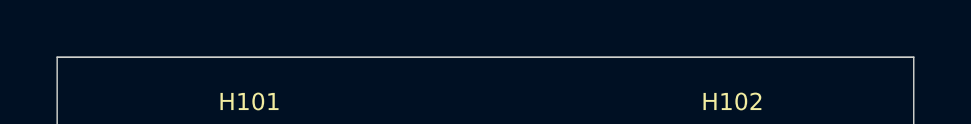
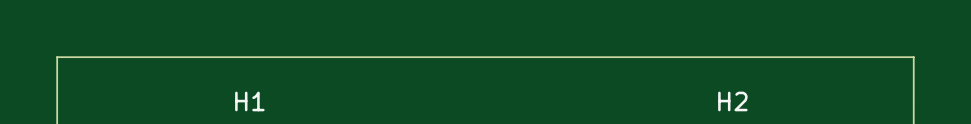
H101 name: H101 (249, 101) -> H1 (249, 101)
H102 name: H102 (732, 101) -> H2 (732, 101)

